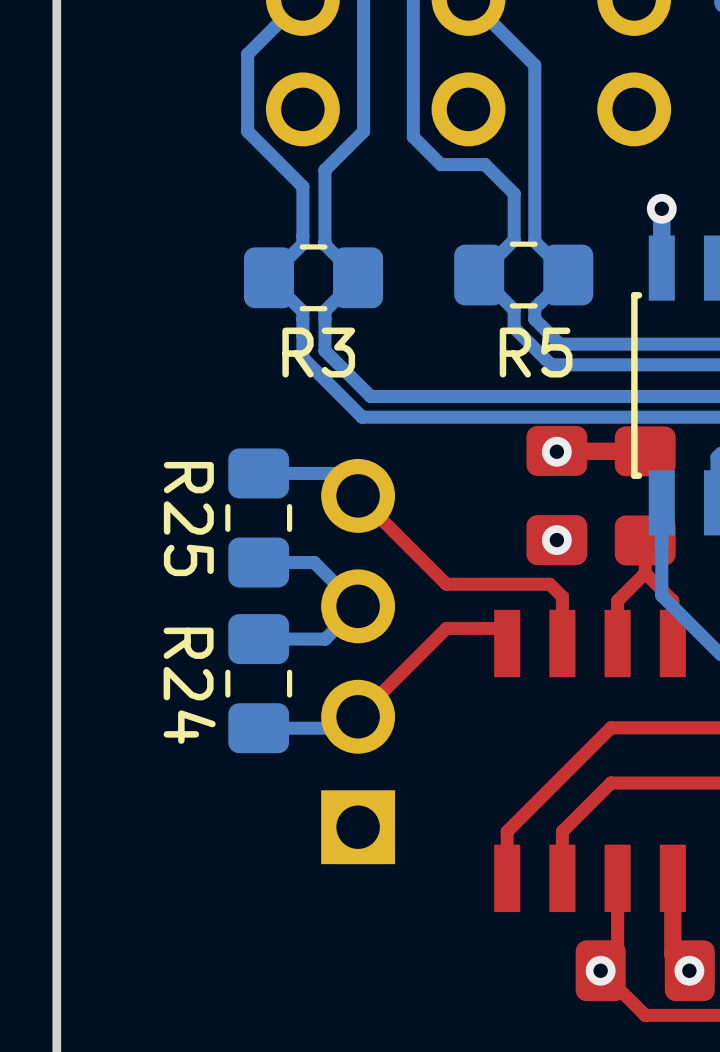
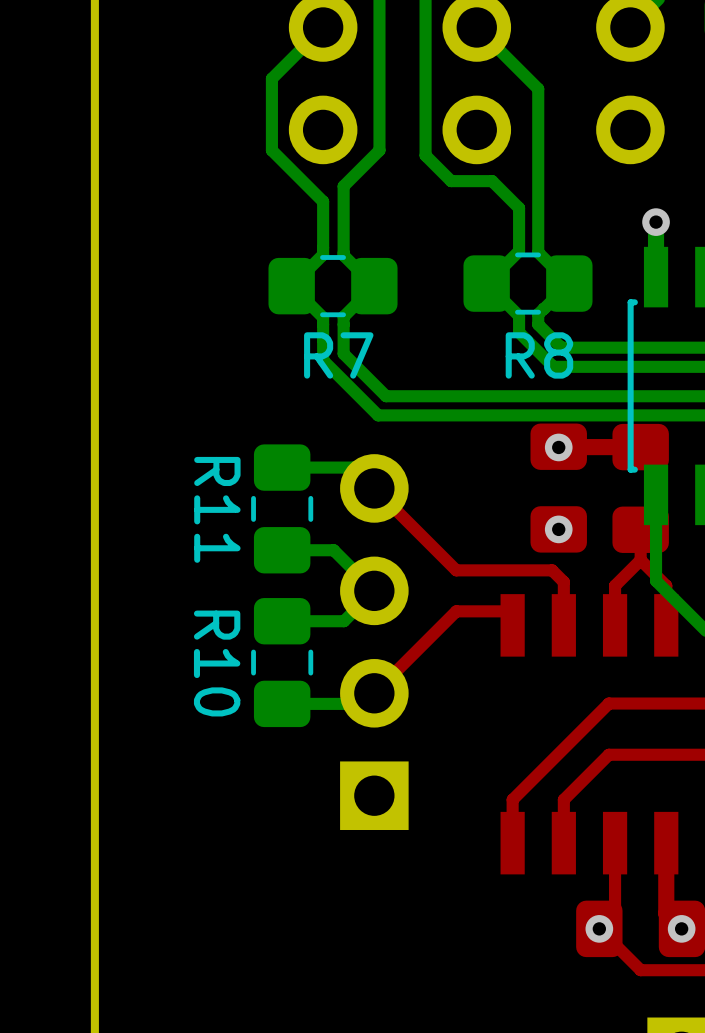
R3 name: R3 (318, 352) -> R7 (338, 355)
R5 name: R5 (536, 352) -> R8 (539, 355)
R25 name: R25 (188, 519) -> R11 (217, 509)
R24 name: R24 (189, 685) -> R10 (217, 663)

